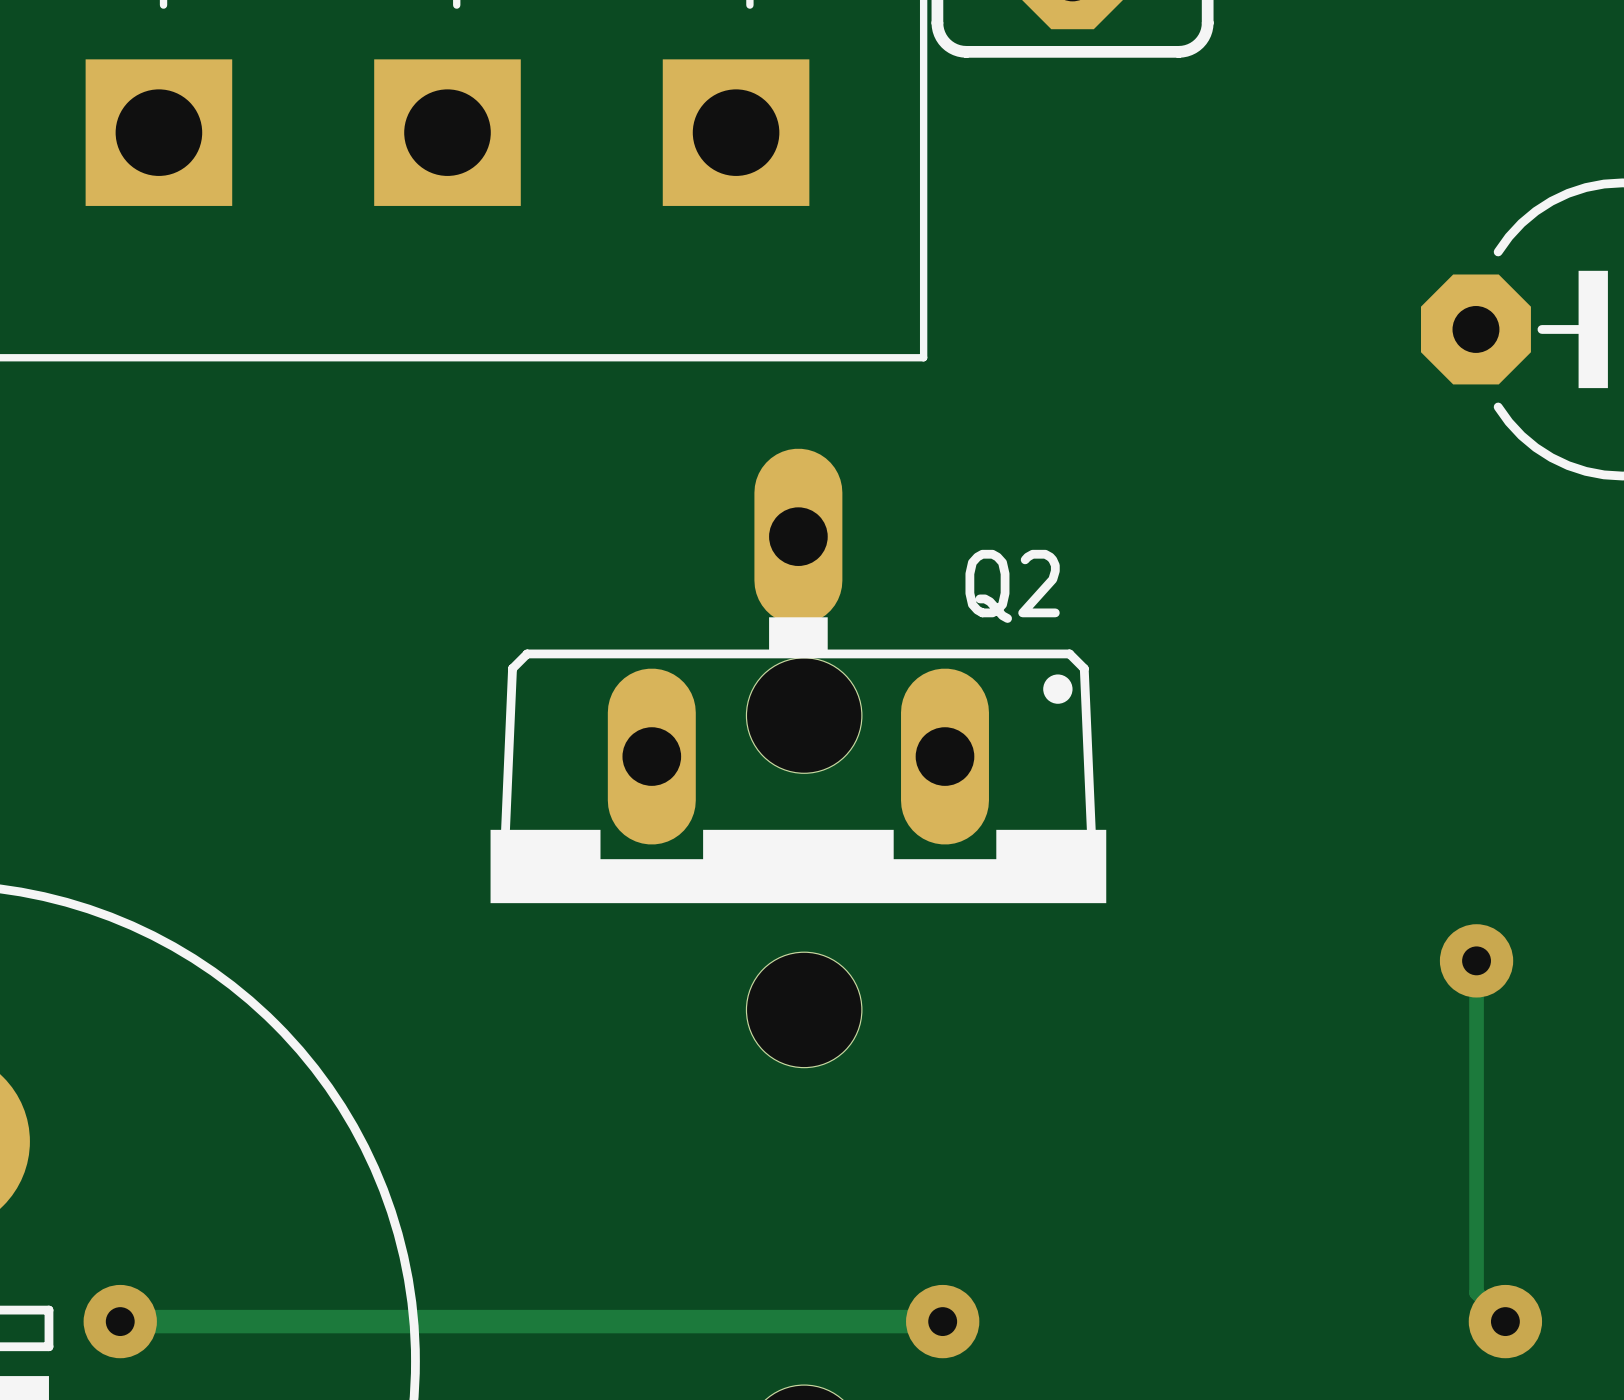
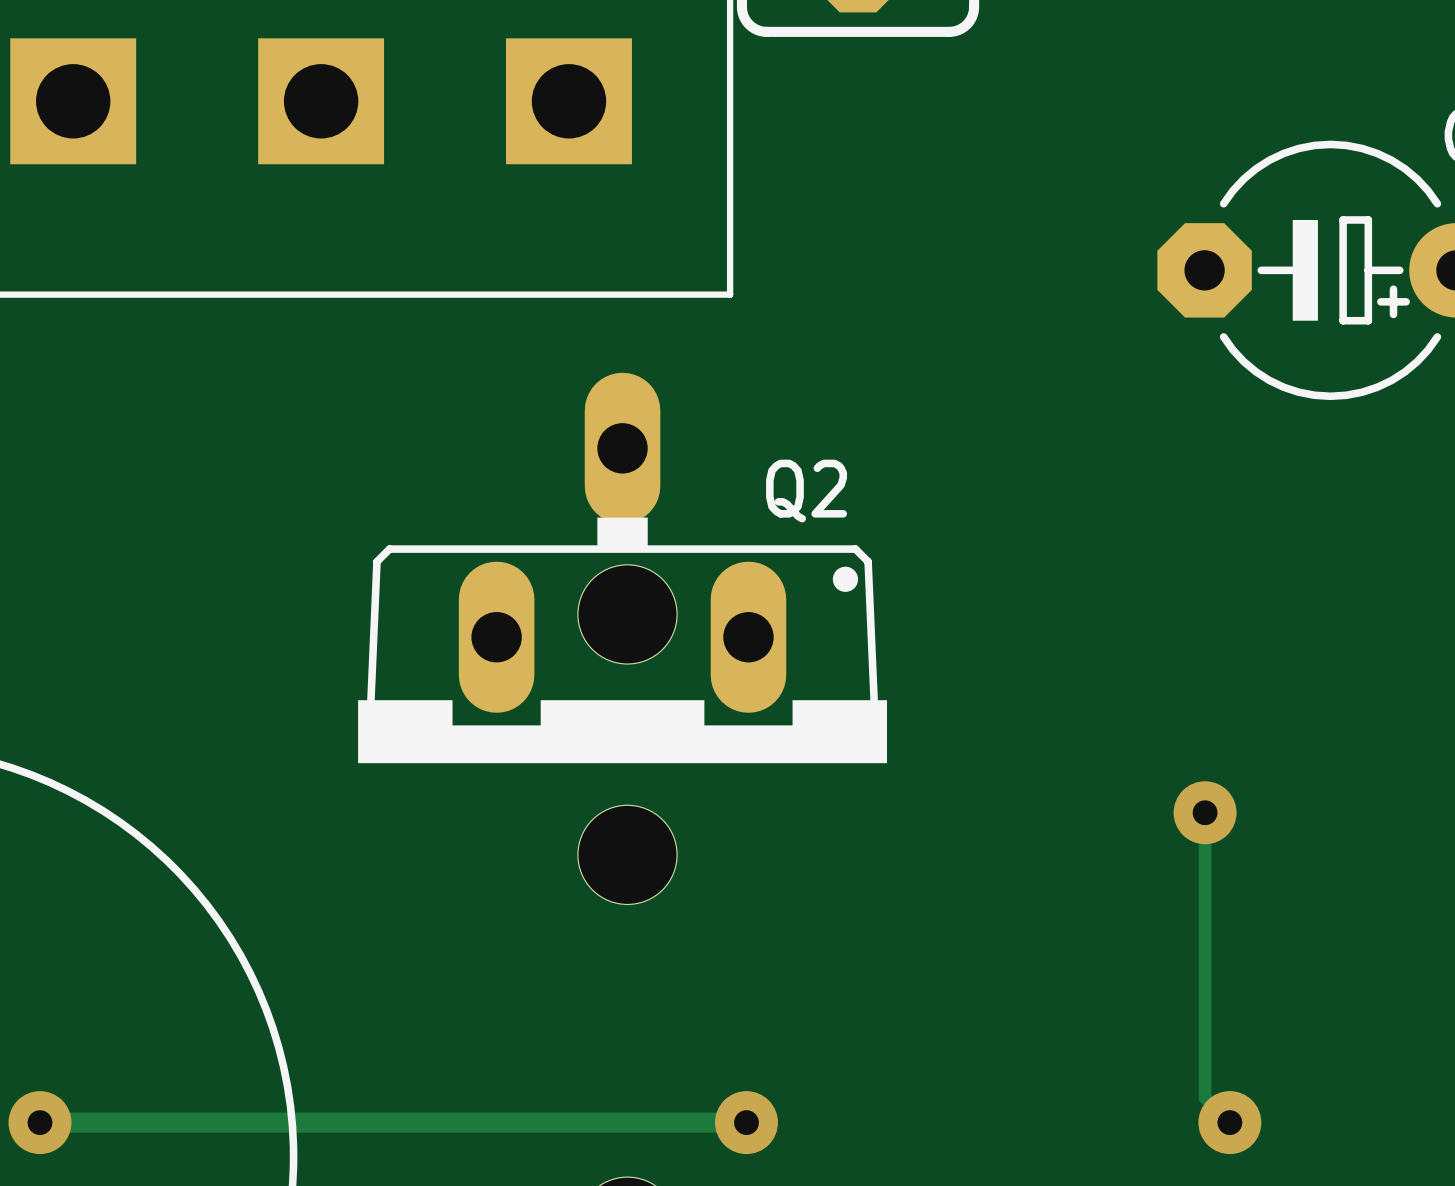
hole position: (804, 715) -> (627, 614)

